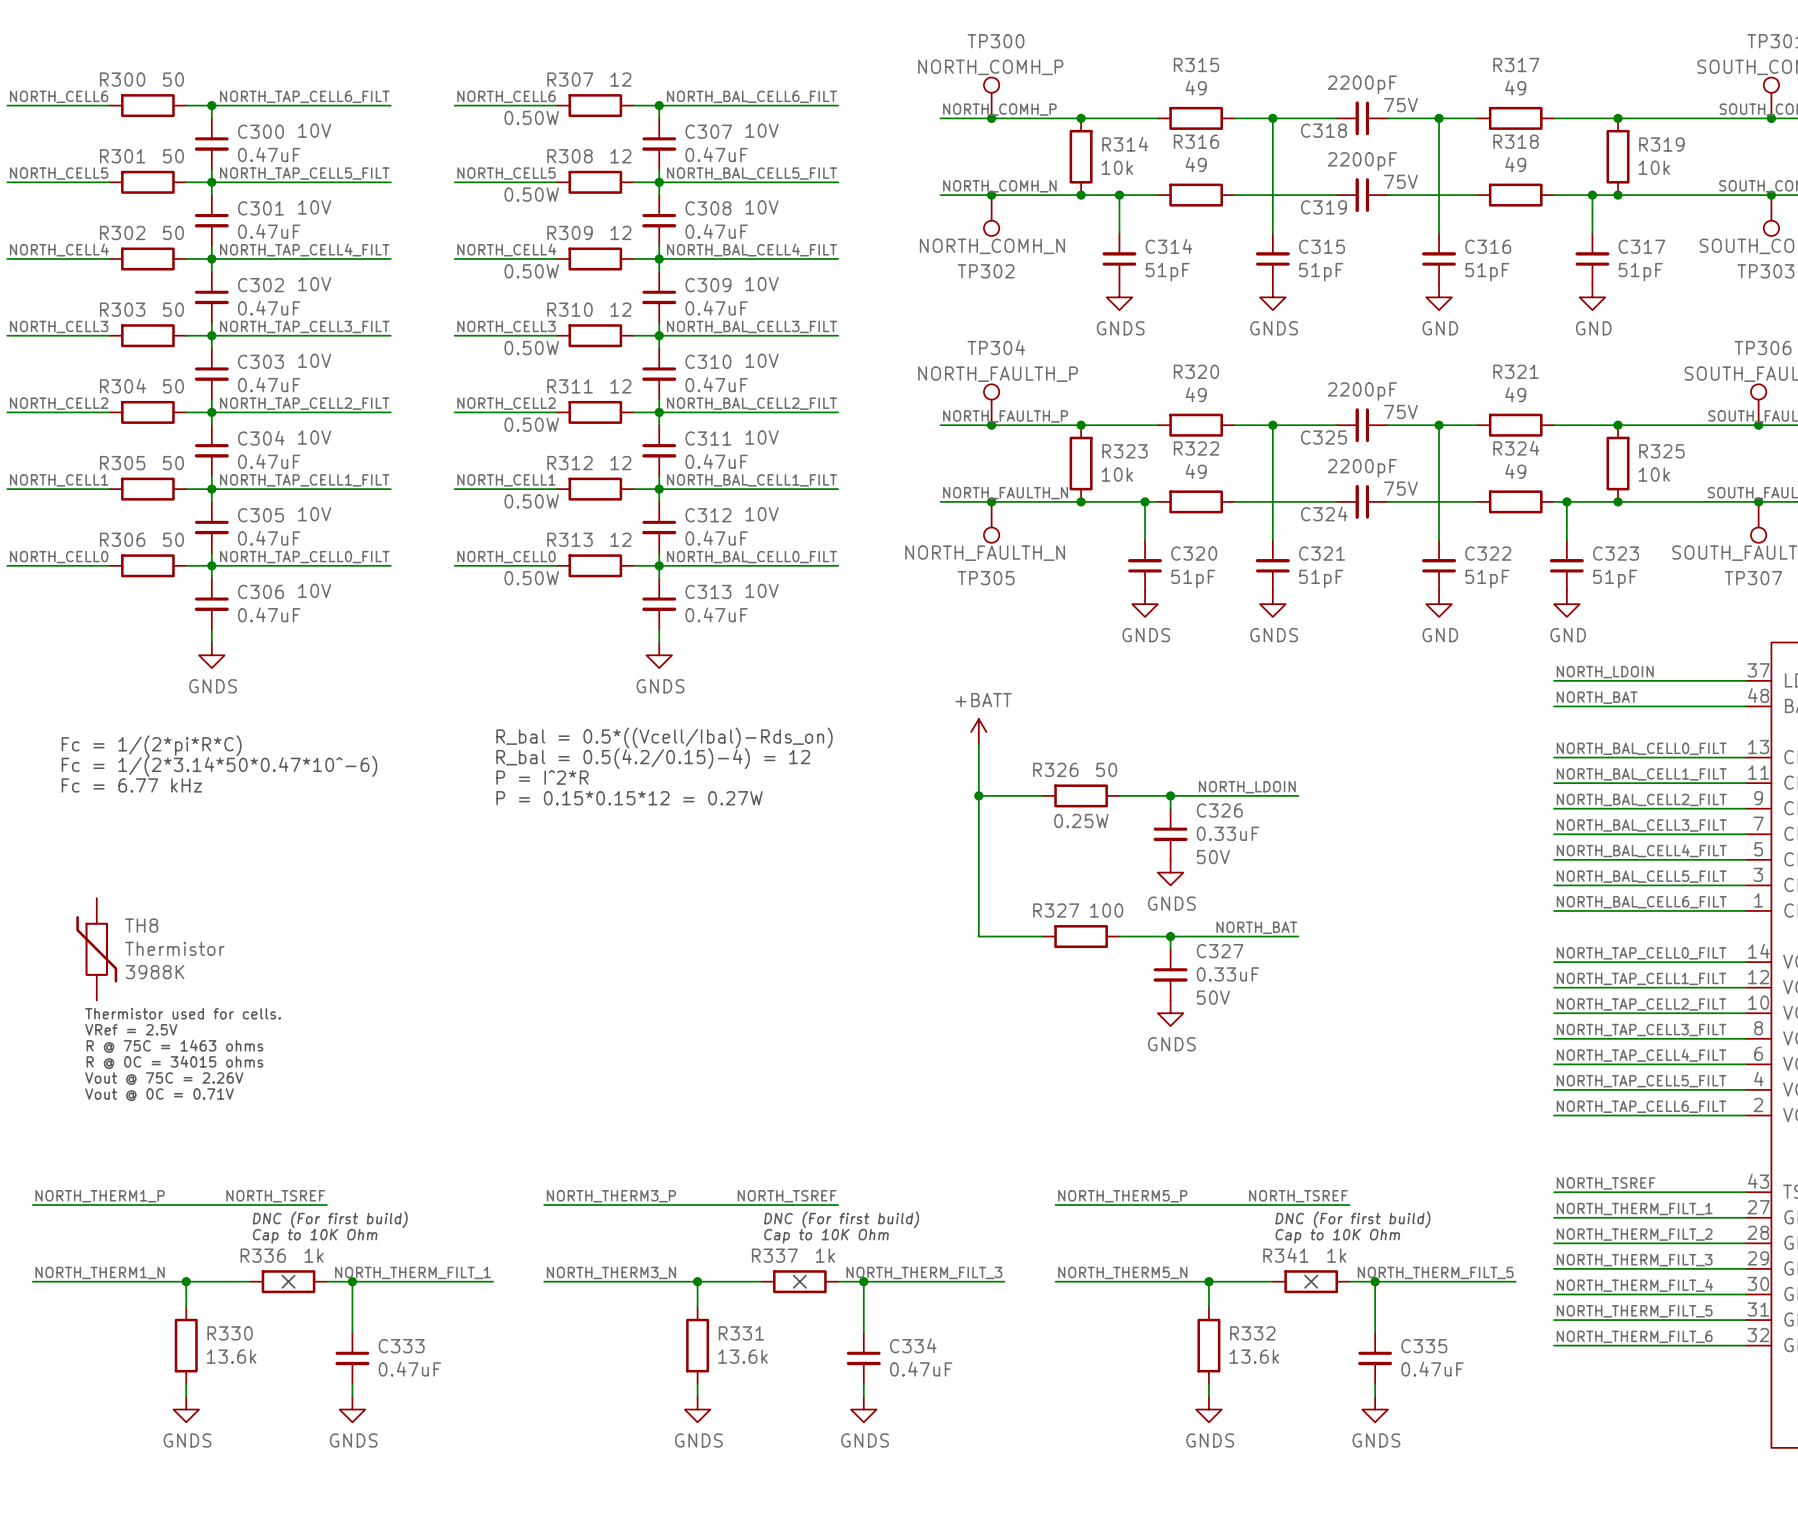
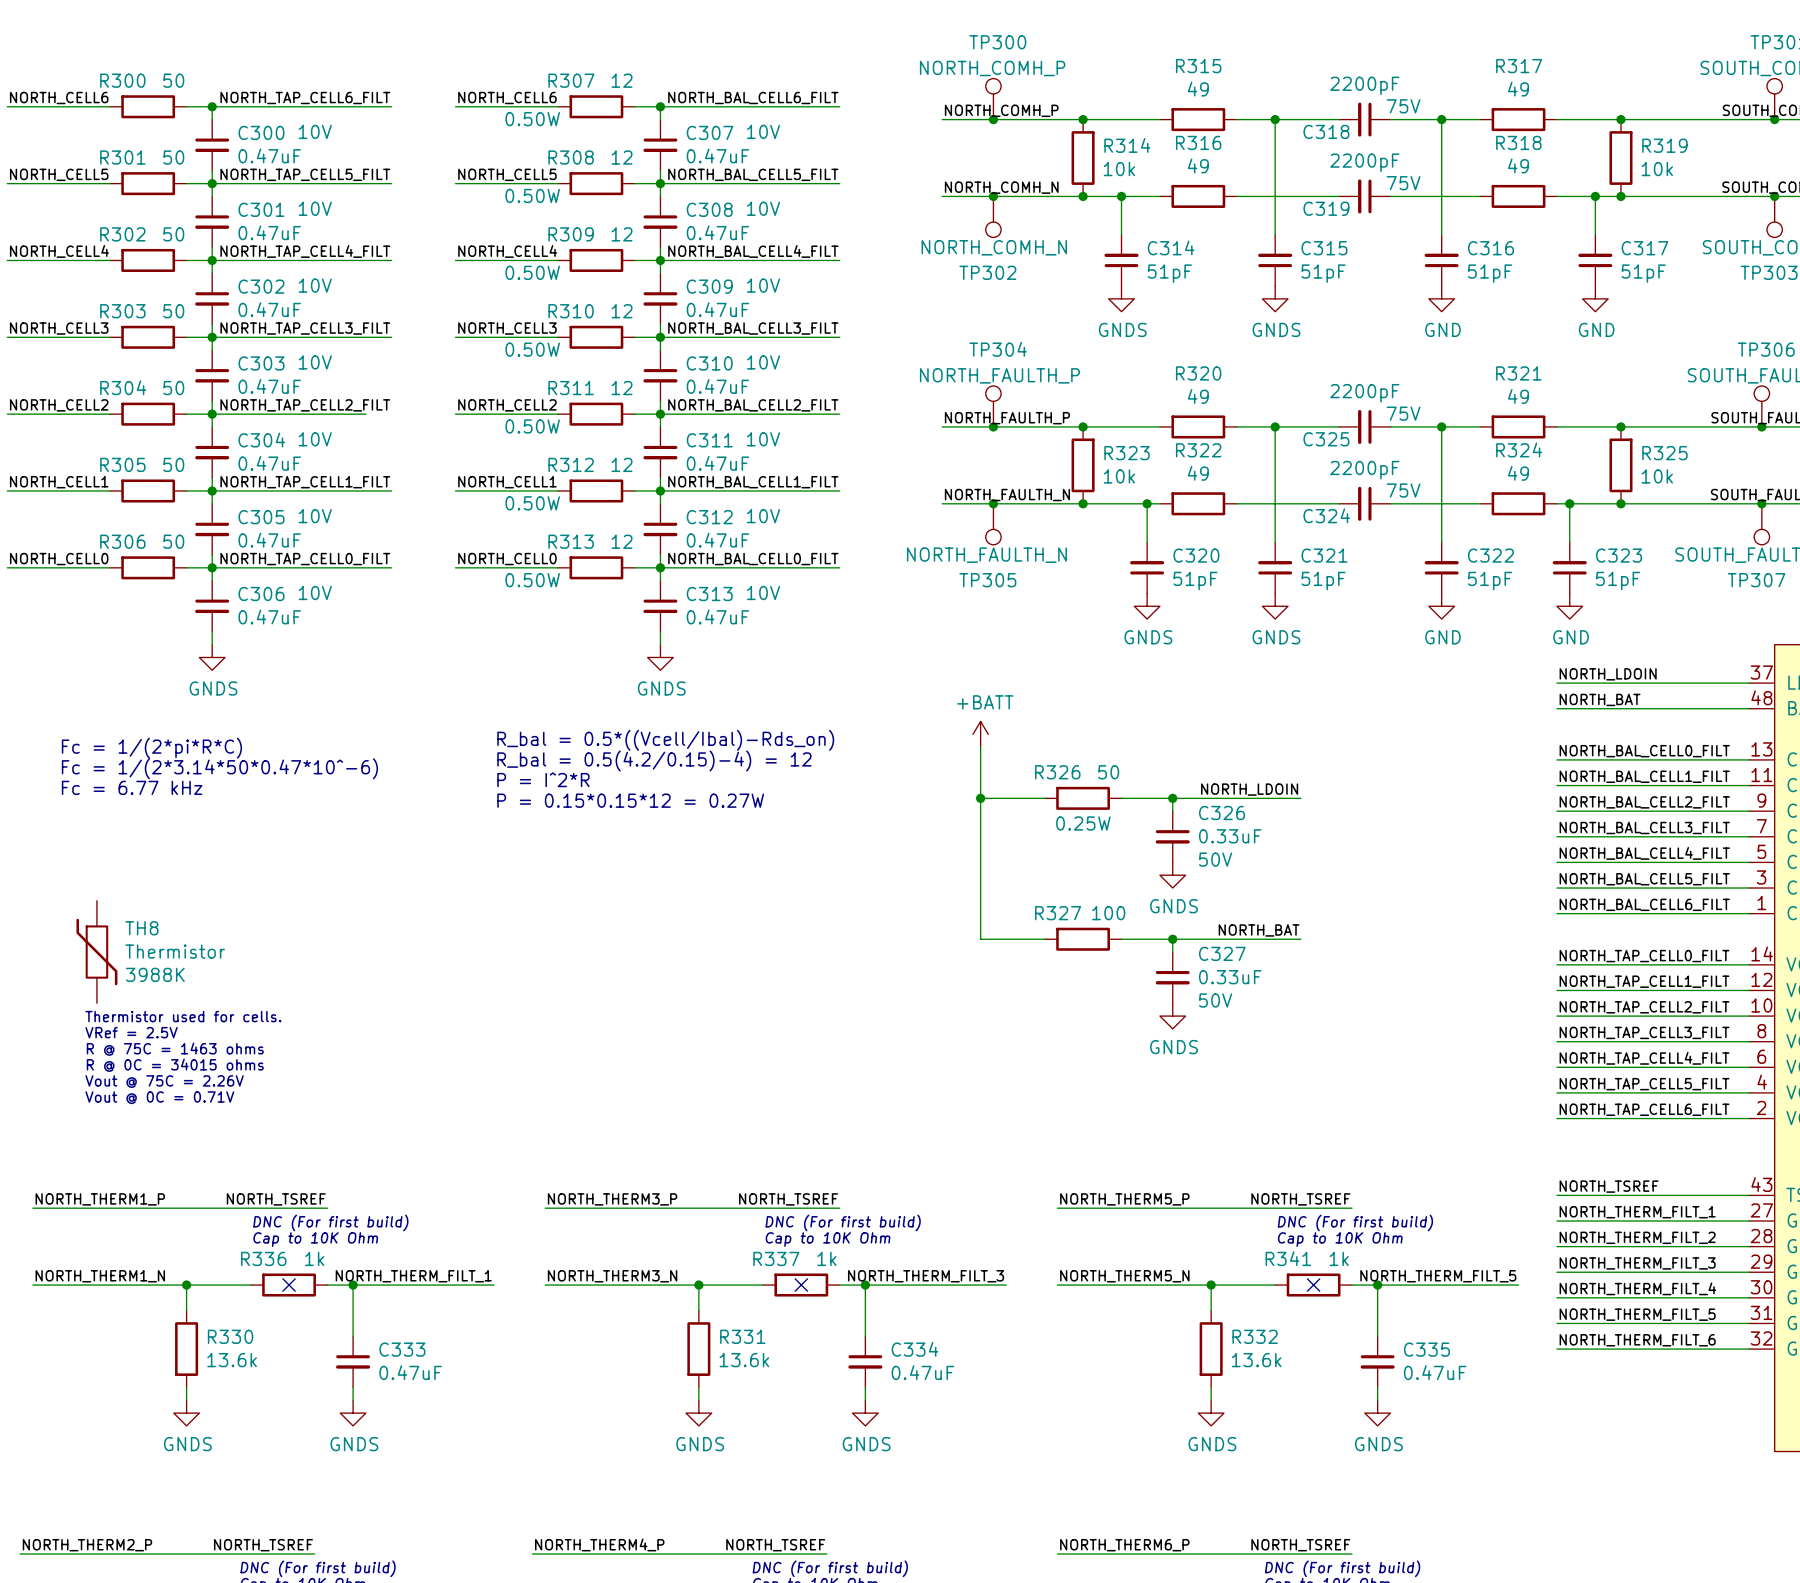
wire: (365, 412) (390, 412) -> none

